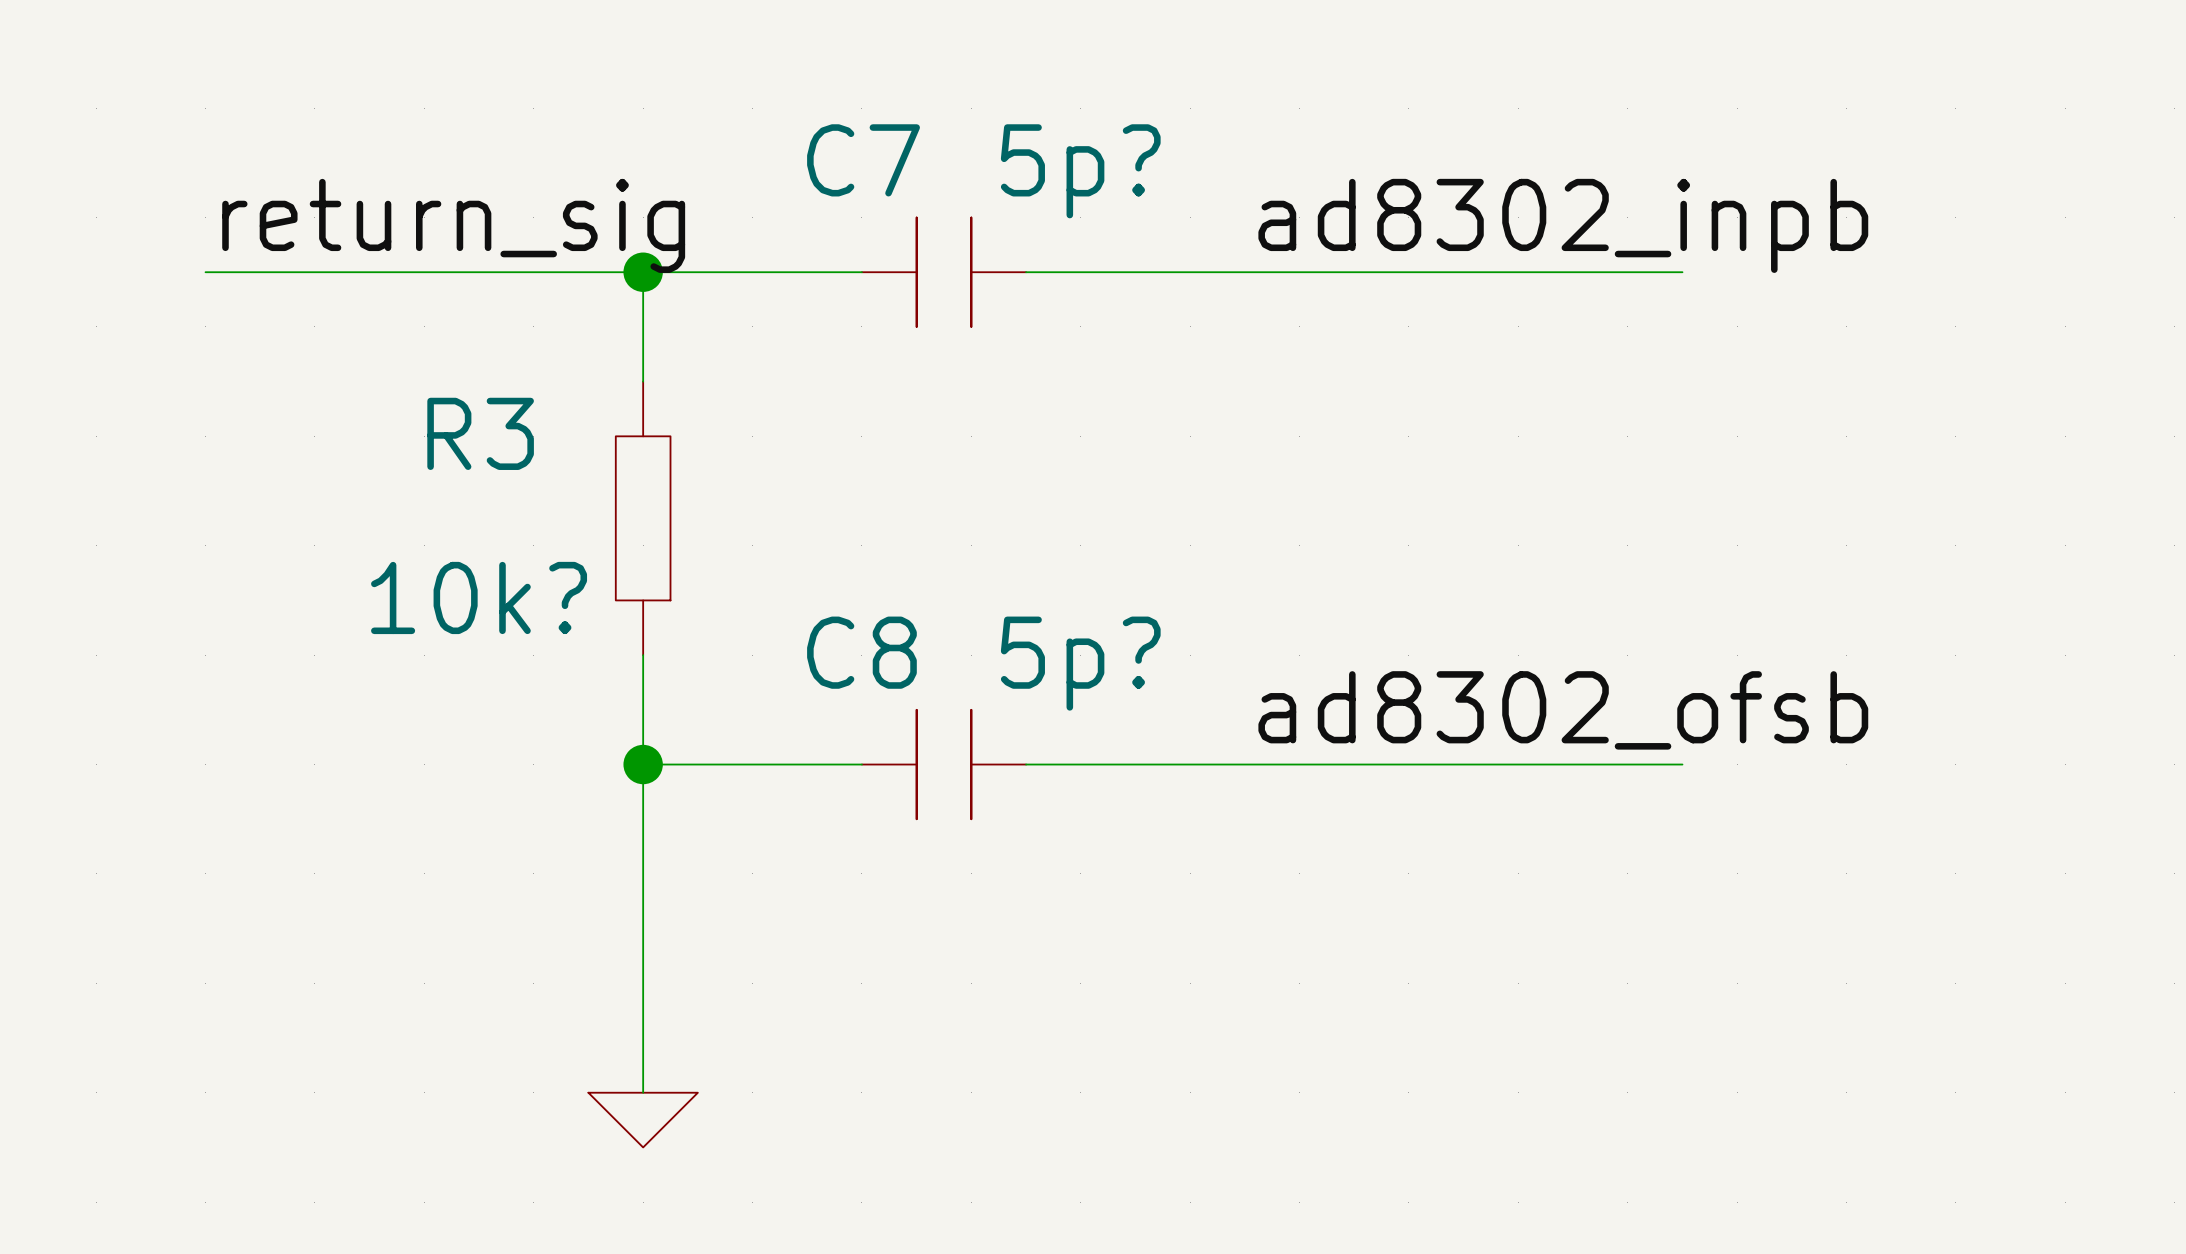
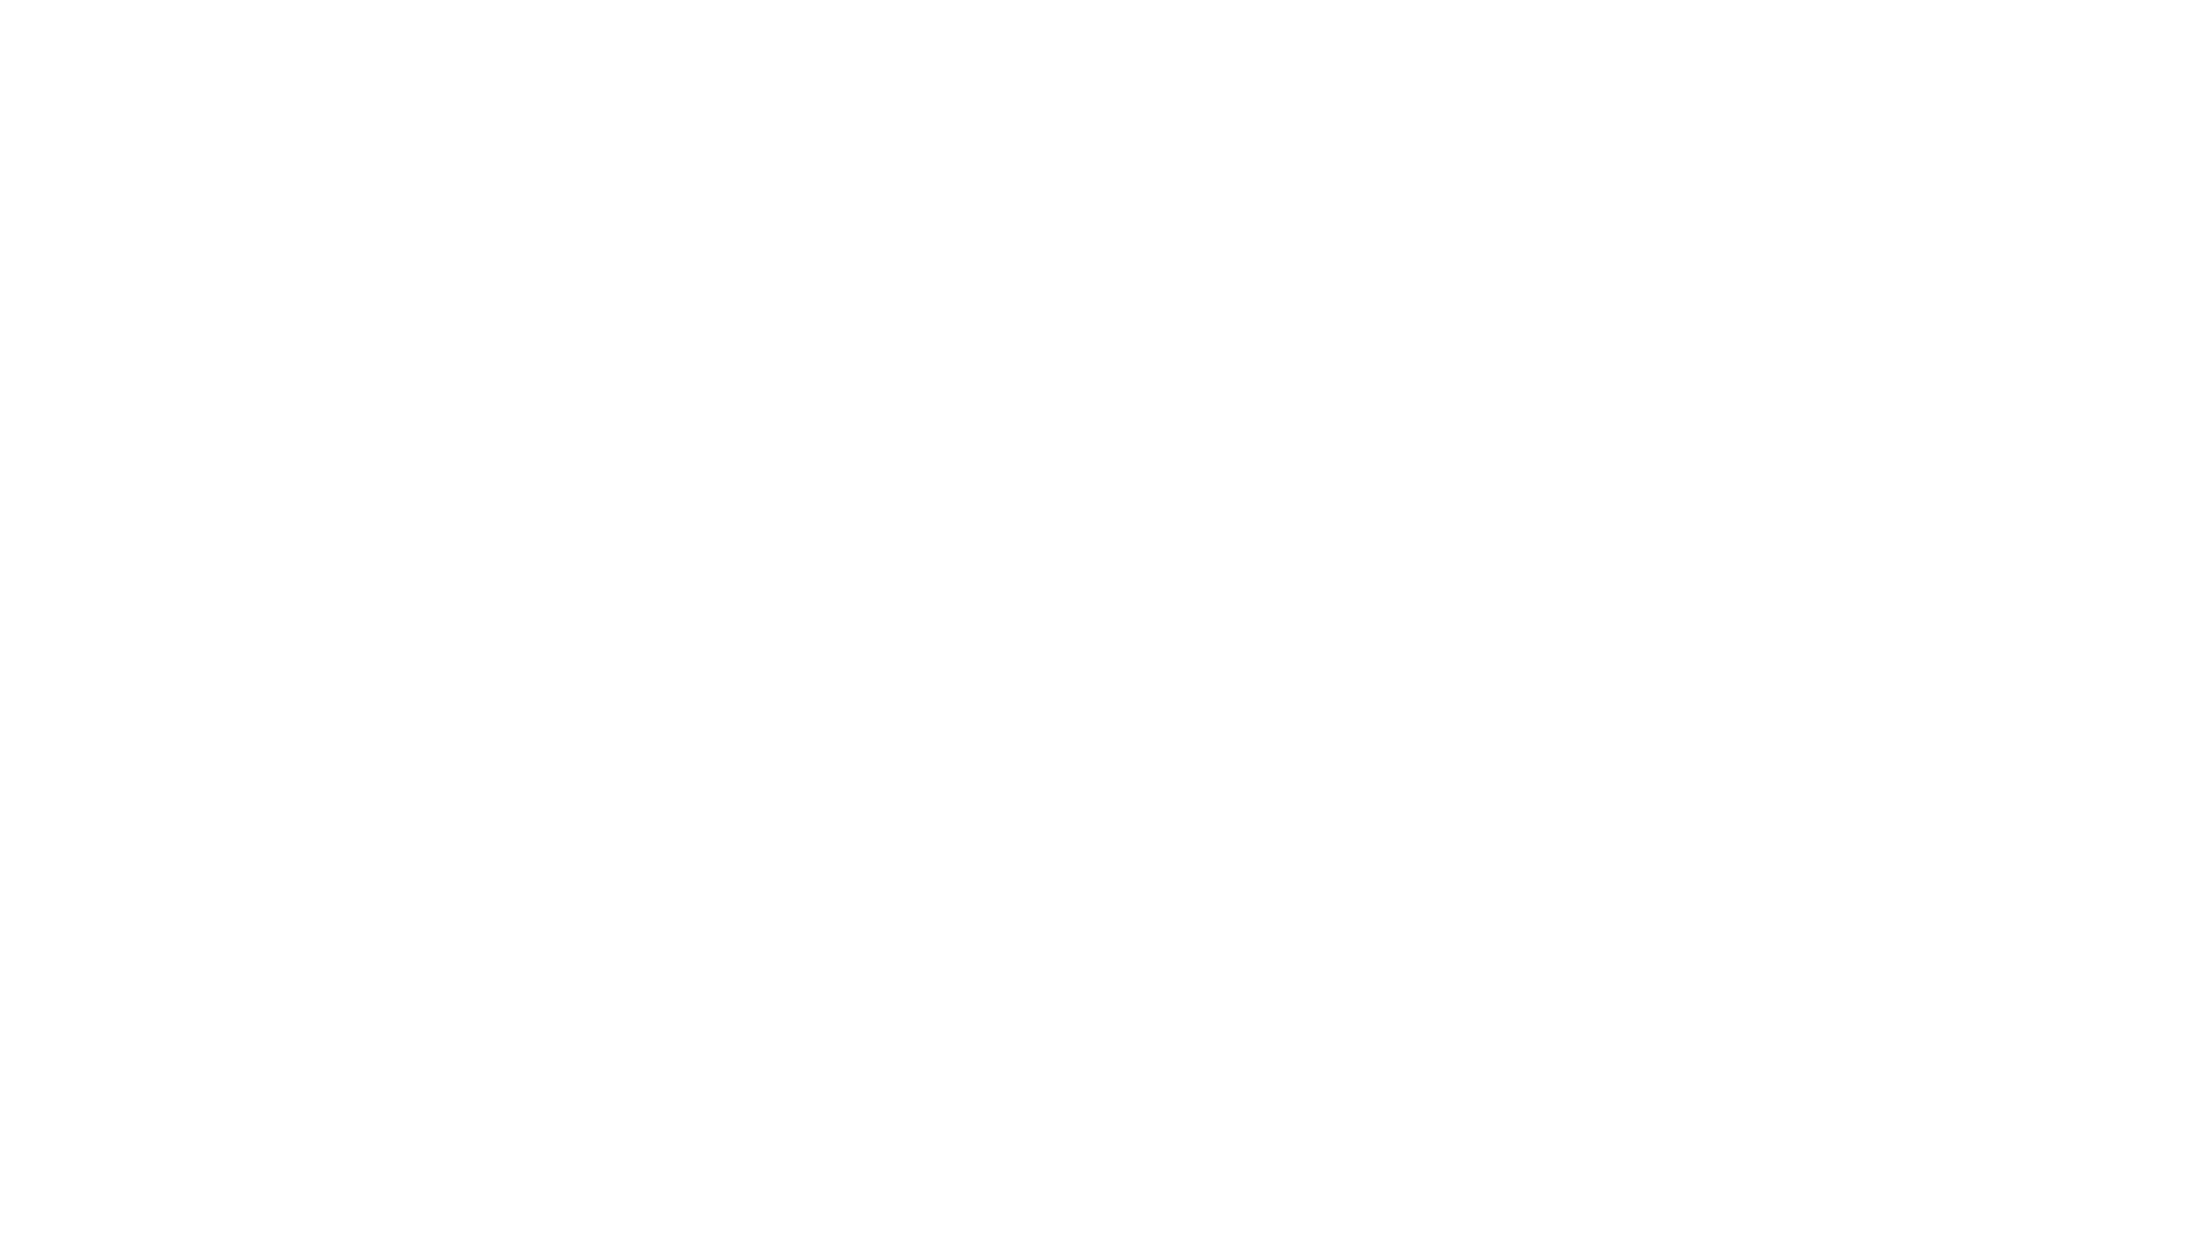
label: return_sig (453, 225) -> none
label: ad8302_inpb (1563, 225) -> none
wire: (205, 272) (861, 272) -> none
wire: (643, 272) (643, 381) -> none
junction: (643, 272) -> none
C7: (944, 272) -> none
wire: (1026, 272) (1682, 272) -> none
R3: (643, 518) -> none
wire: (643, 655) (643, 1092) -> none
label: ad8302_ofsb (1563, 710) -> none
wire: (643, 764) (861, 764) -> none
junction: (643, 764) -> none
C8: (944, 764) -> none
wire: (1026, 764) (1682, 764) -> none
power symbol: (643, 1120) -> none

